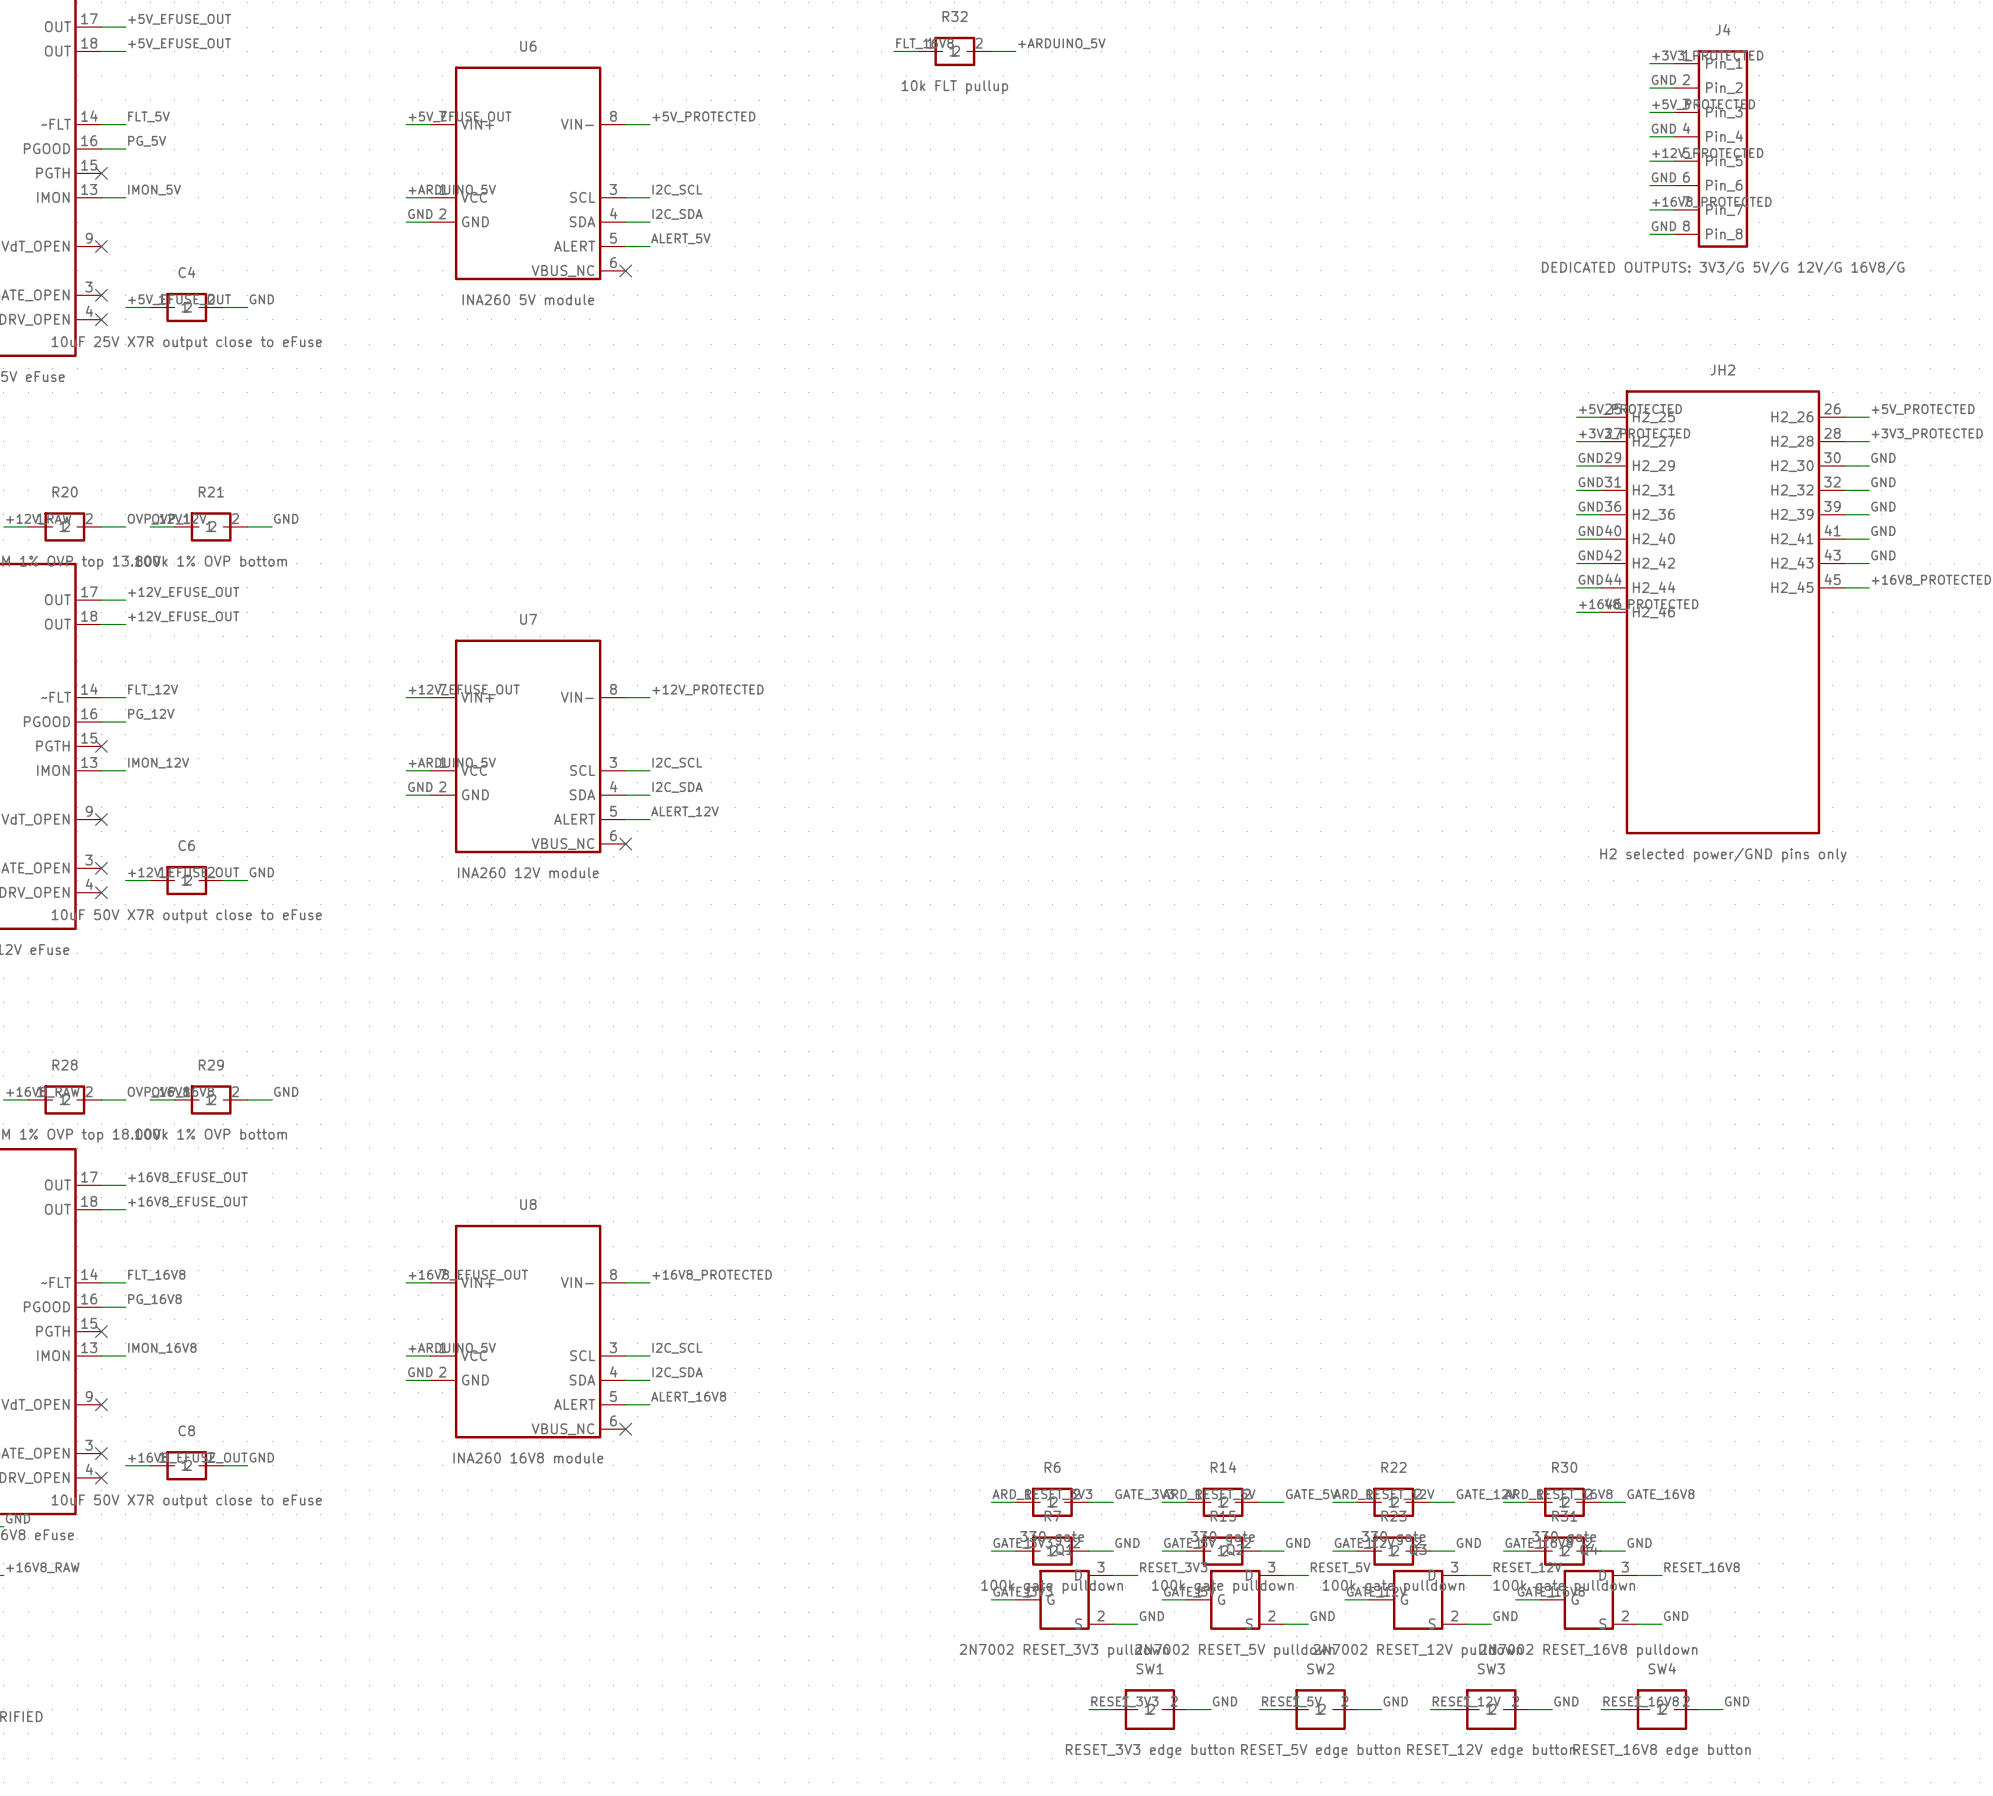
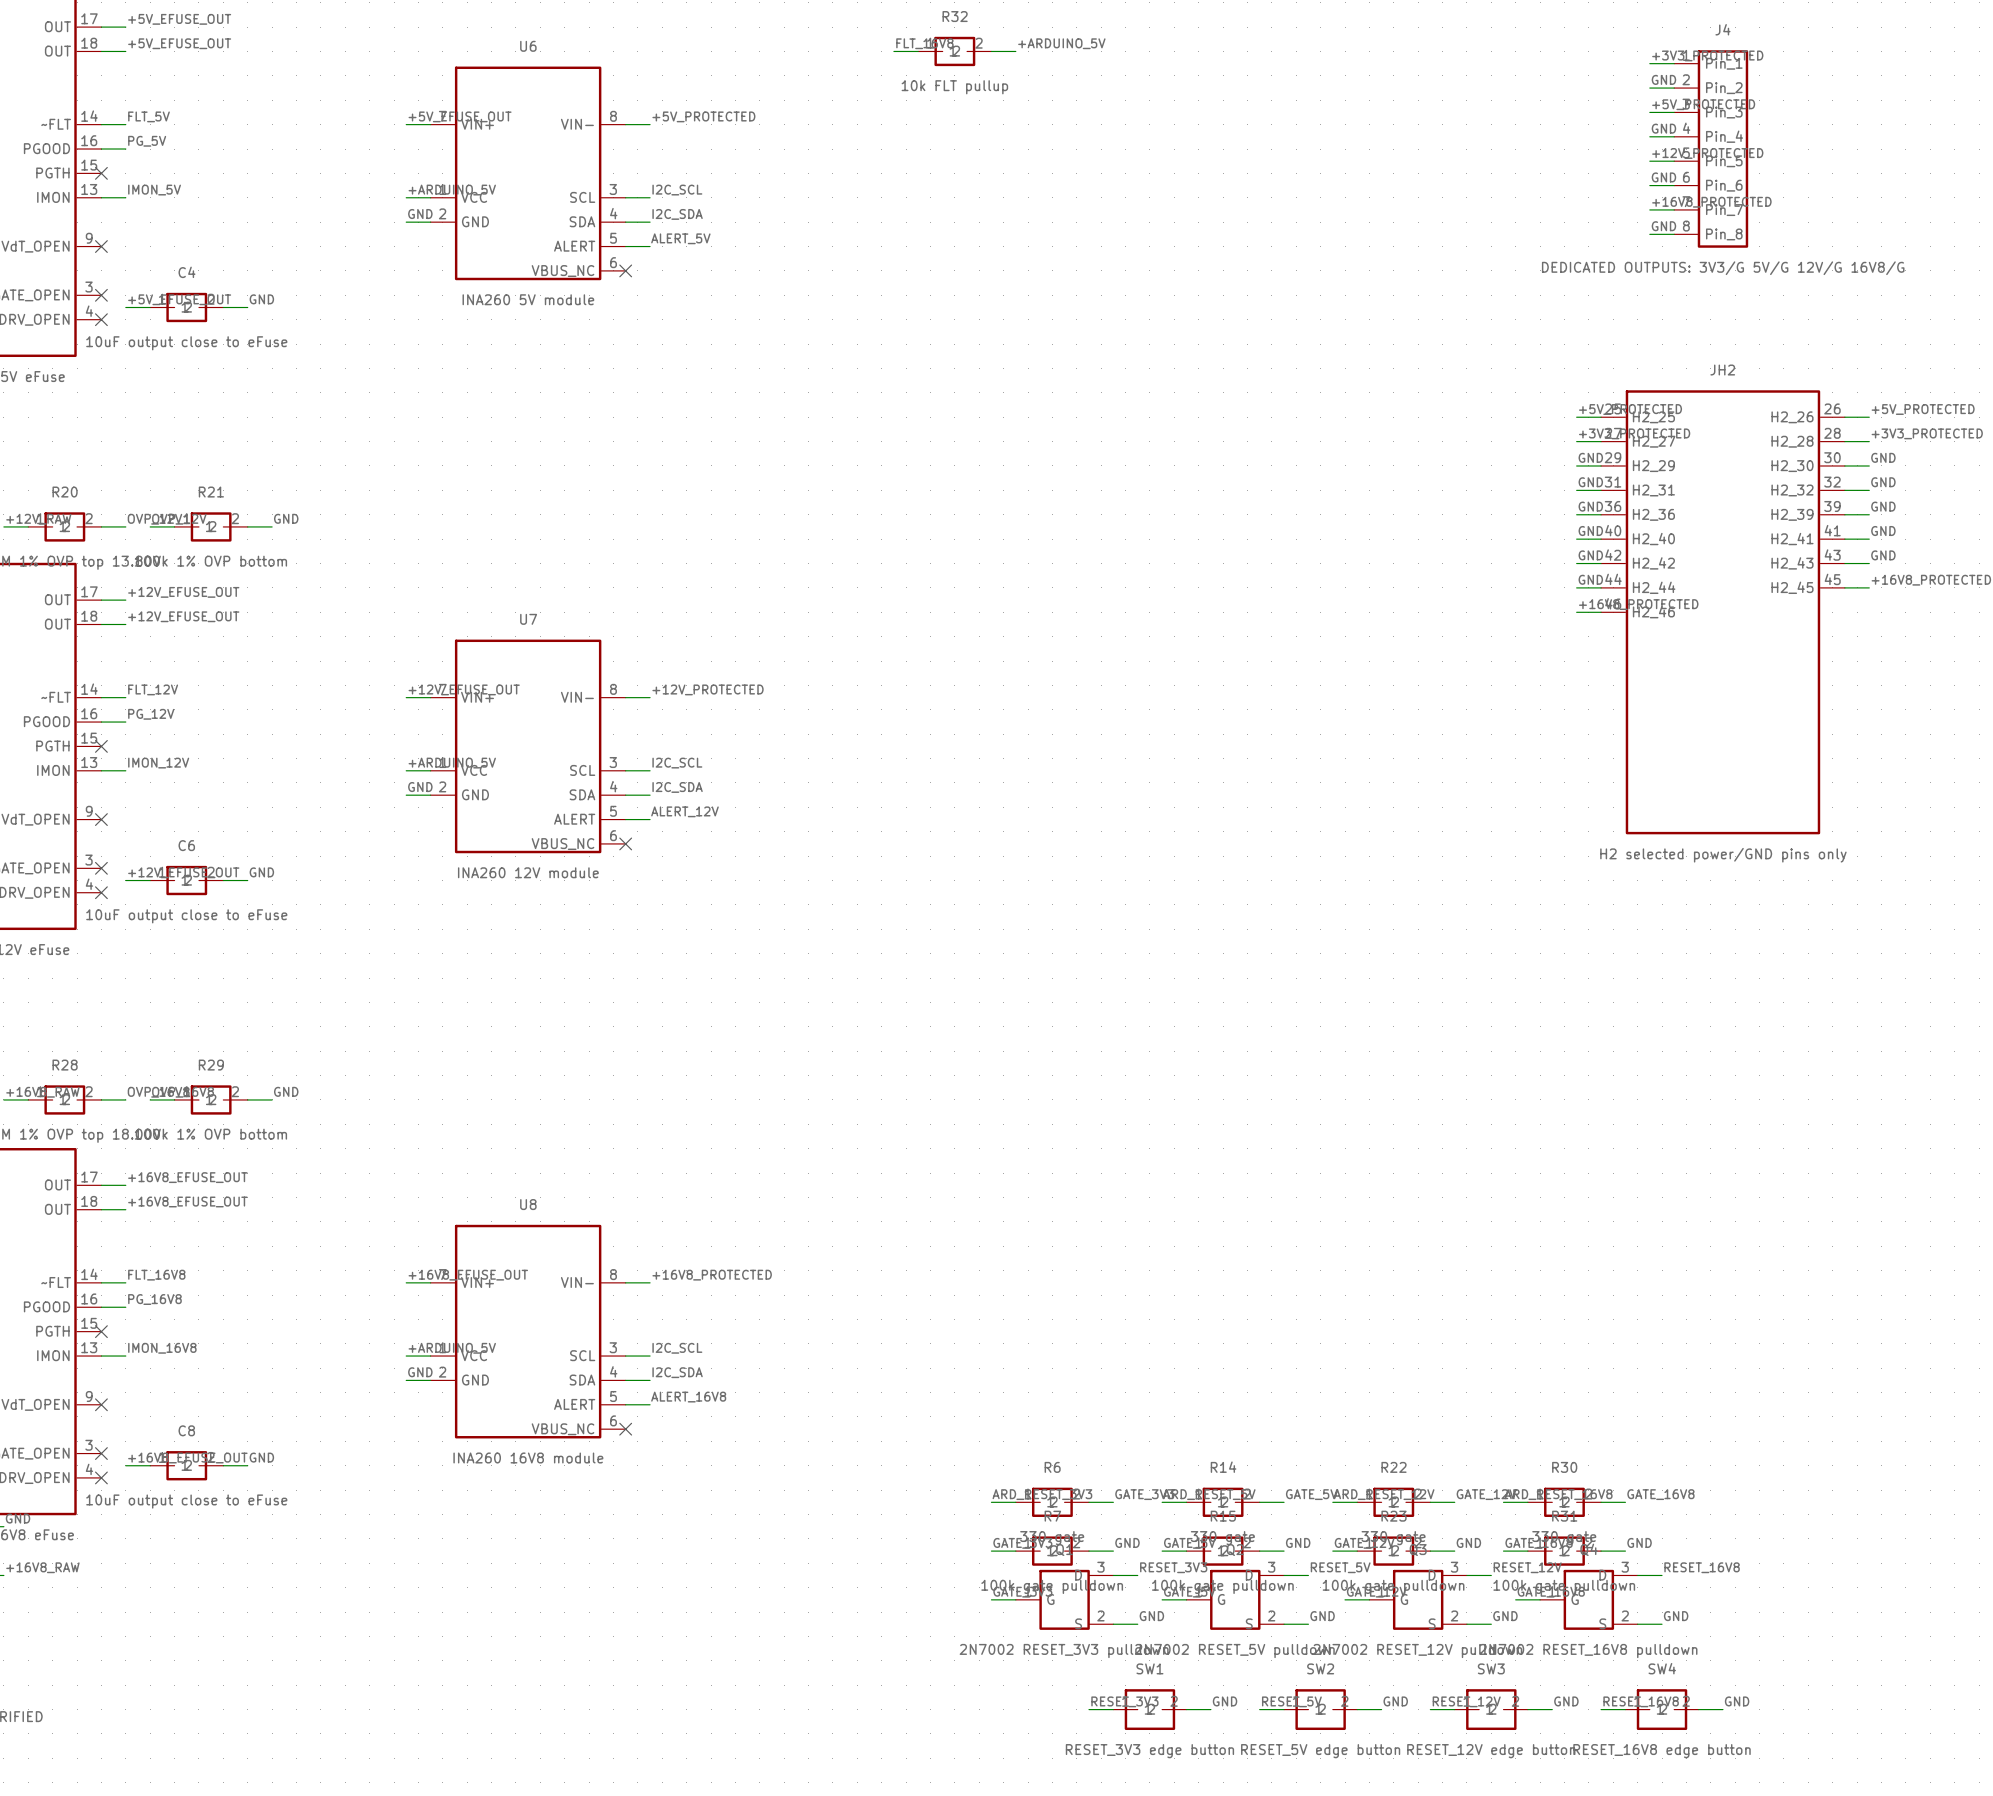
C4 value: 10uF 25V X7R output close to eFuse (186, 343) -> 10uF output close to eFuse (186, 343)
C6 value: 10uF 50V X7R output close to eFuse (186, 916) -> 10uF output close to eFuse (186, 916)
C8 value: 10uF 50V X7R output close to eFuse (186, 1501) -> 10uF output close to eFuse (186, 1501)

